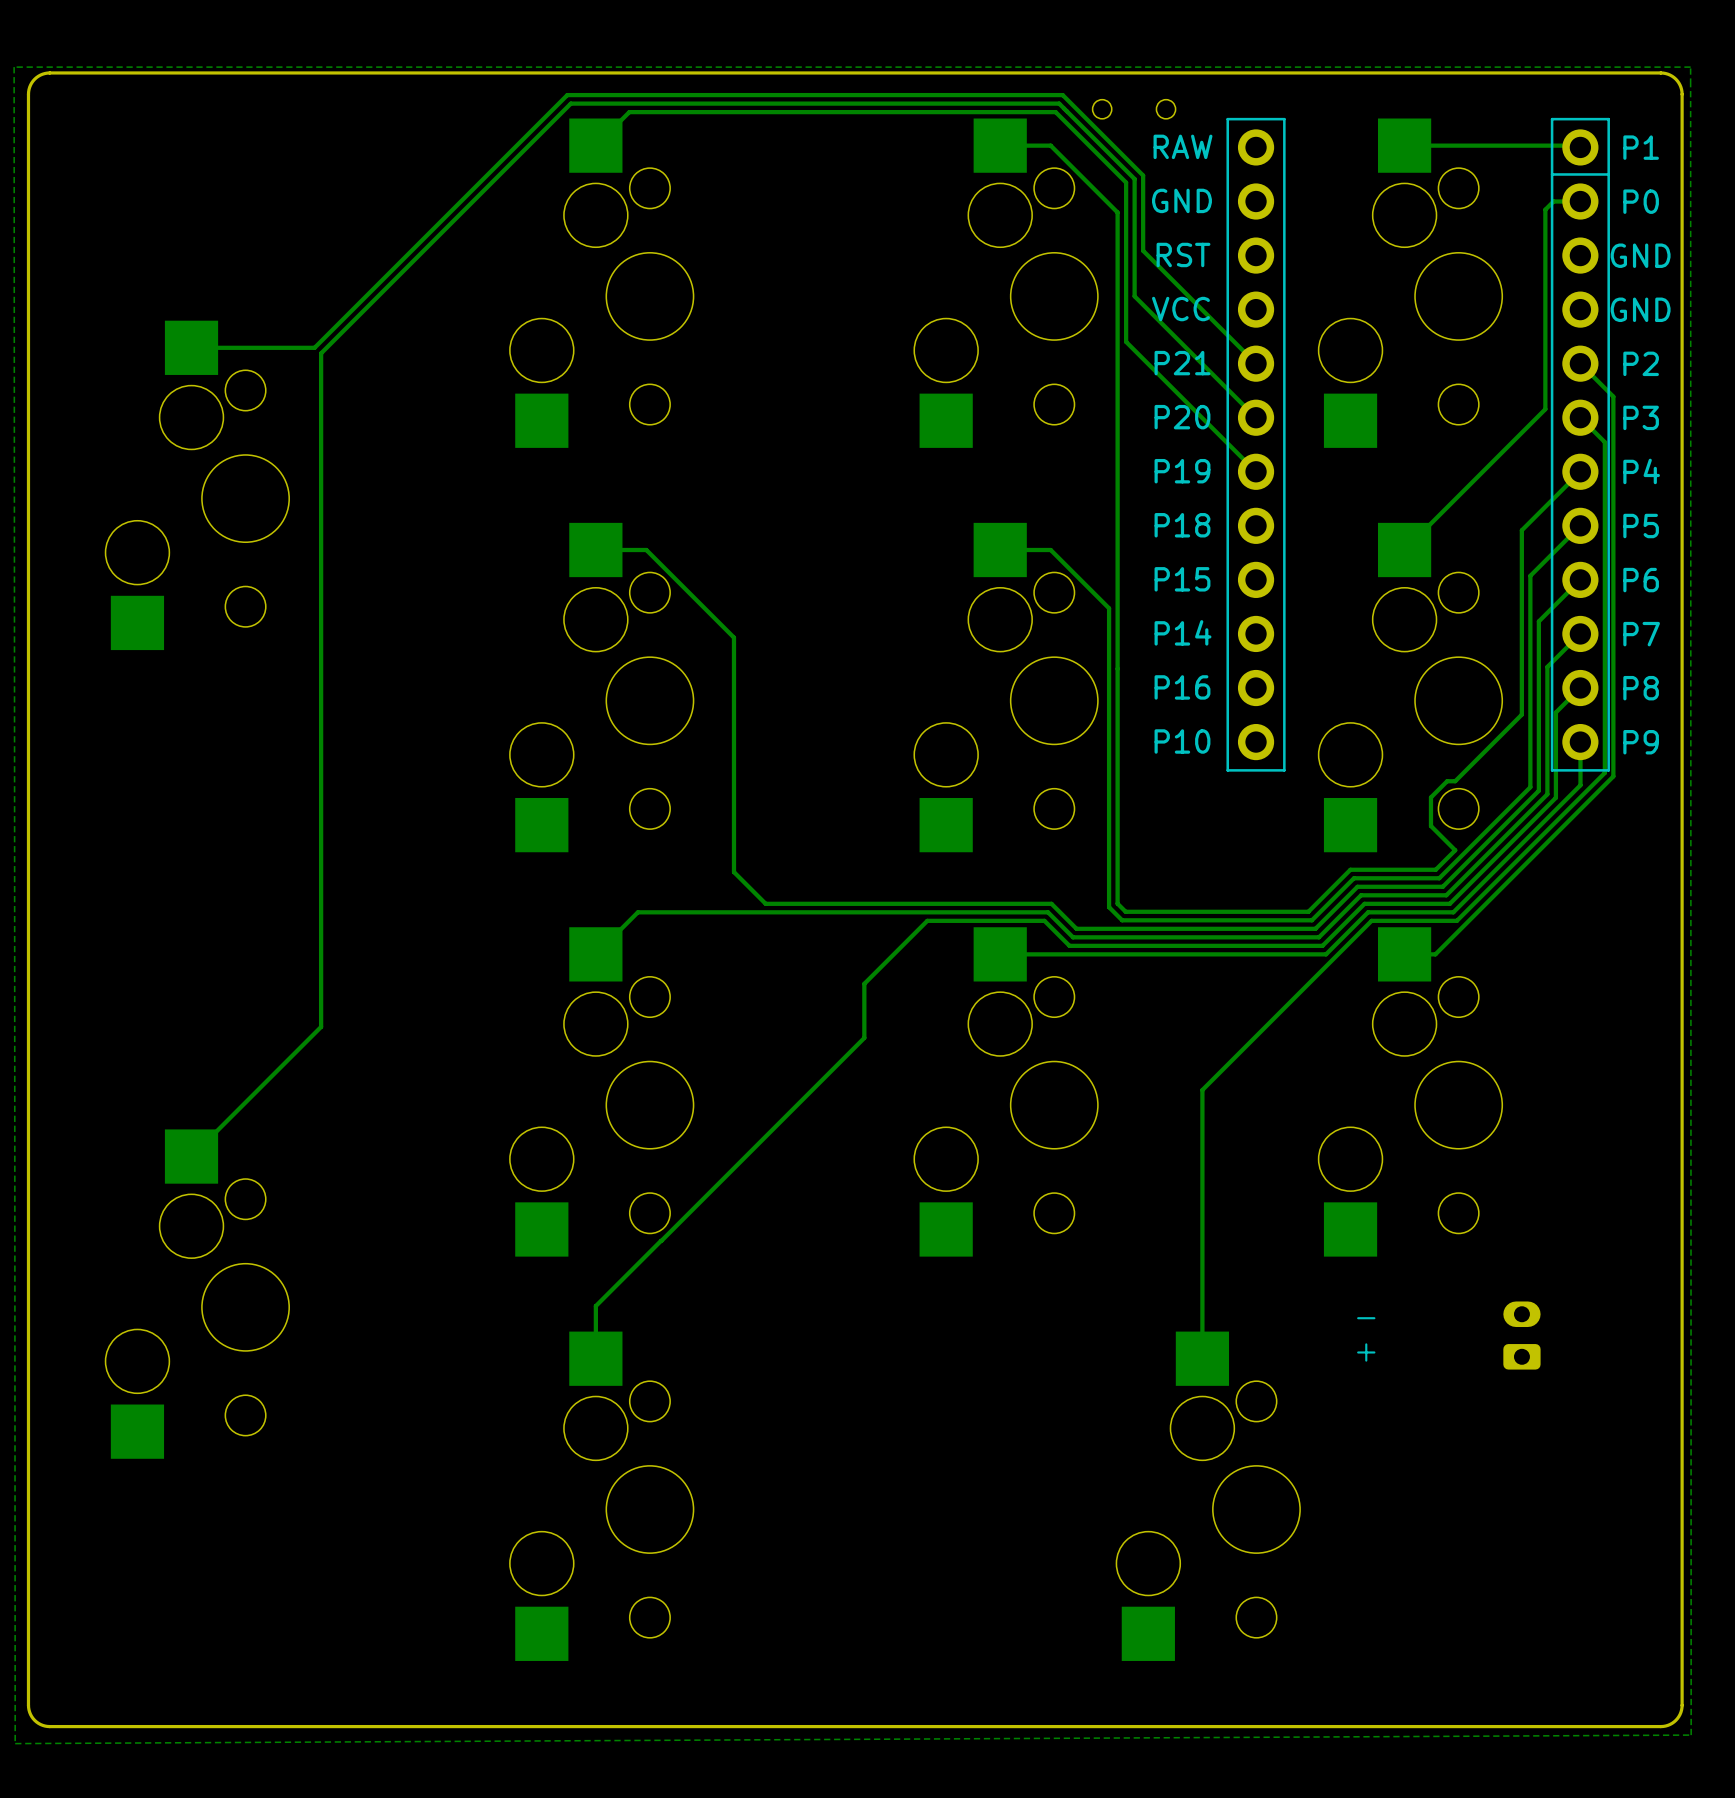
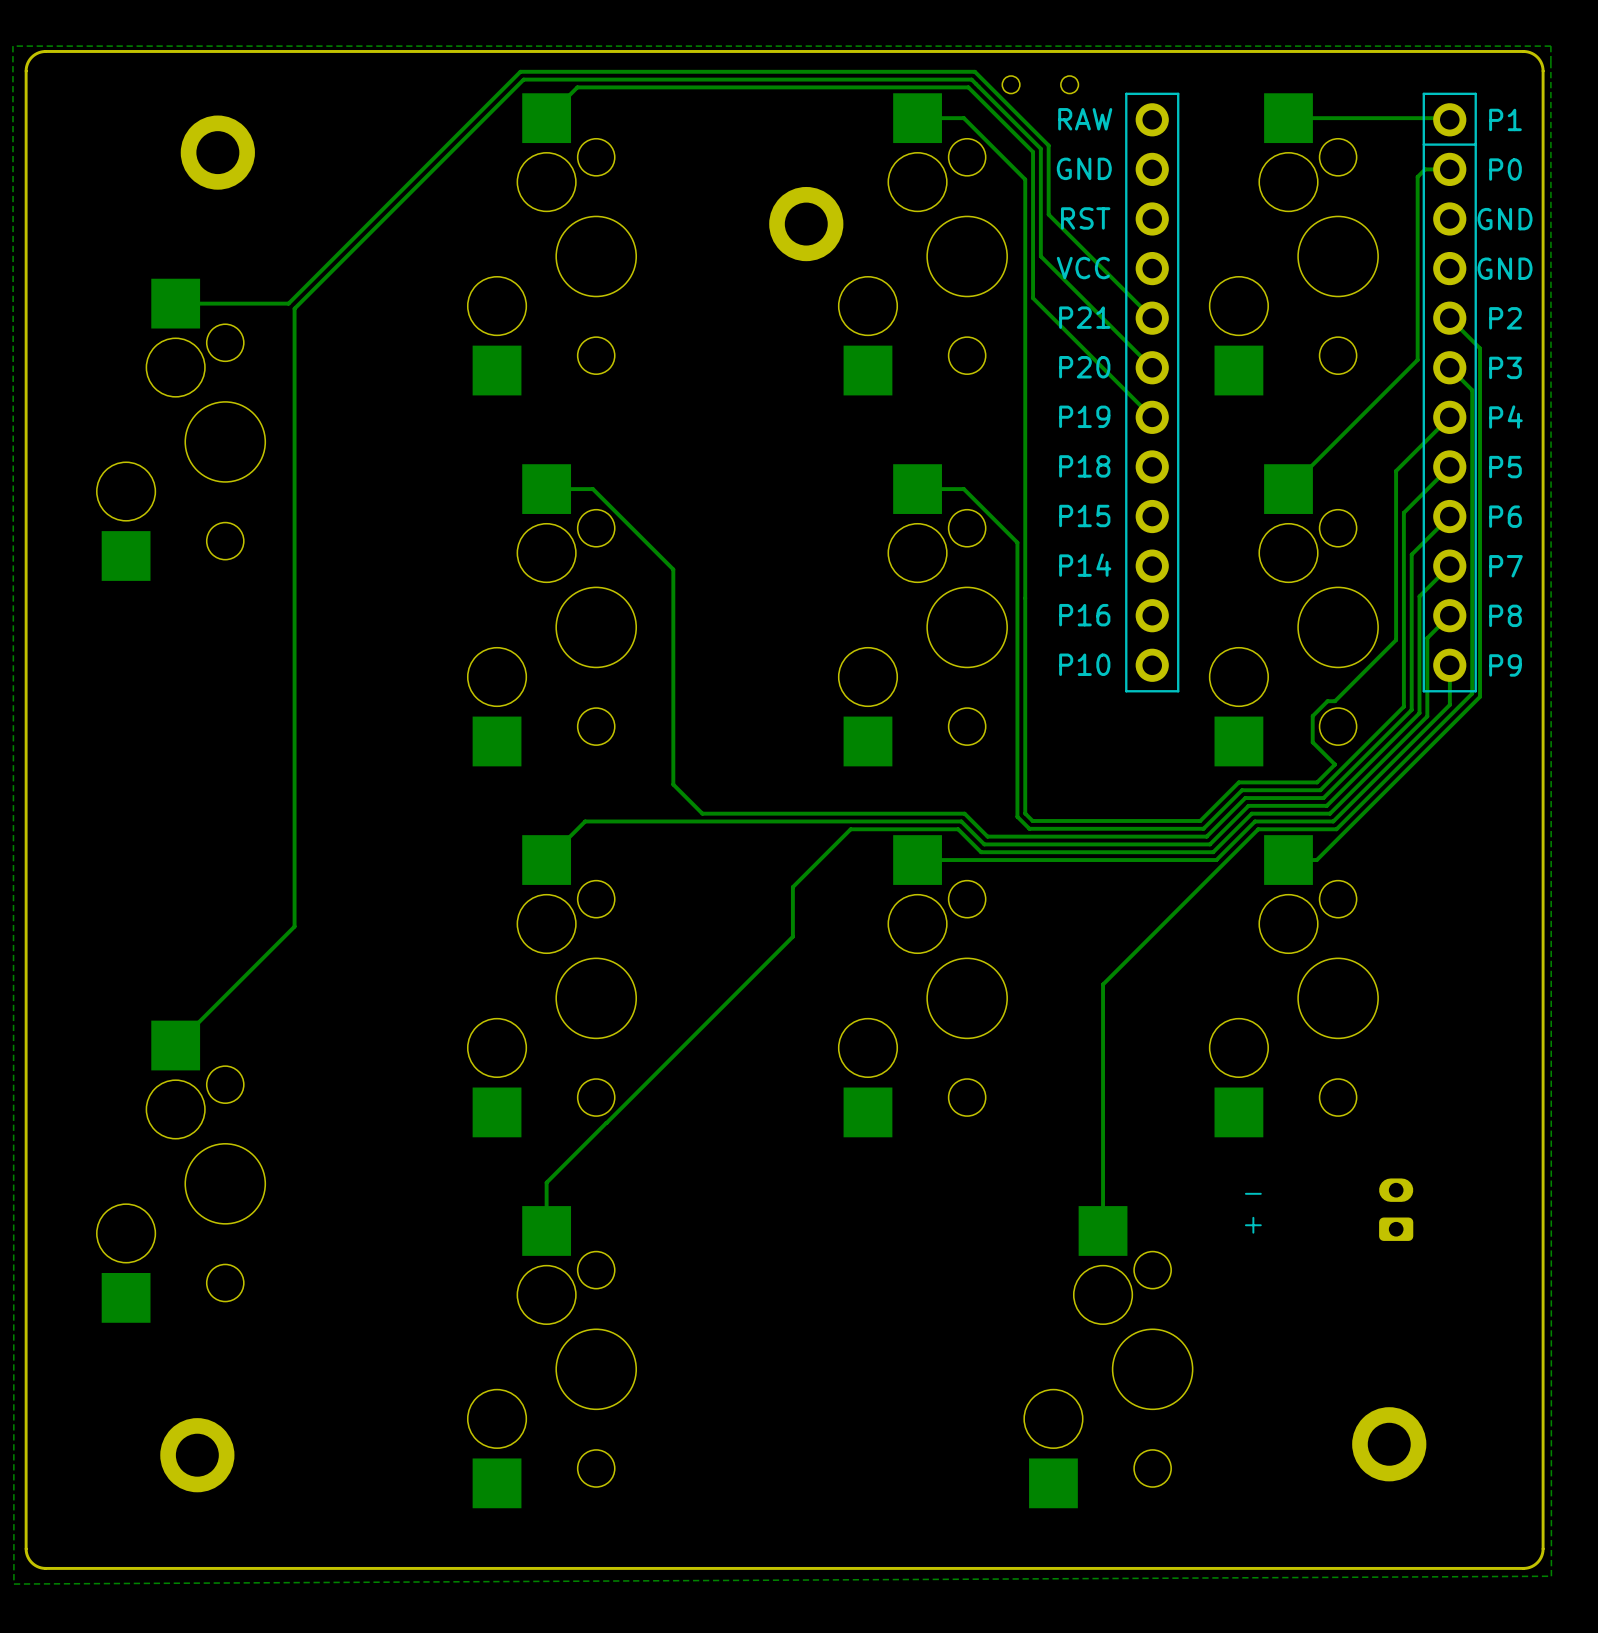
part: none -> (217, 152)
part: none -> (806, 224)
part: none -> (1389, 1444)
part: none -> (197, 1455)

